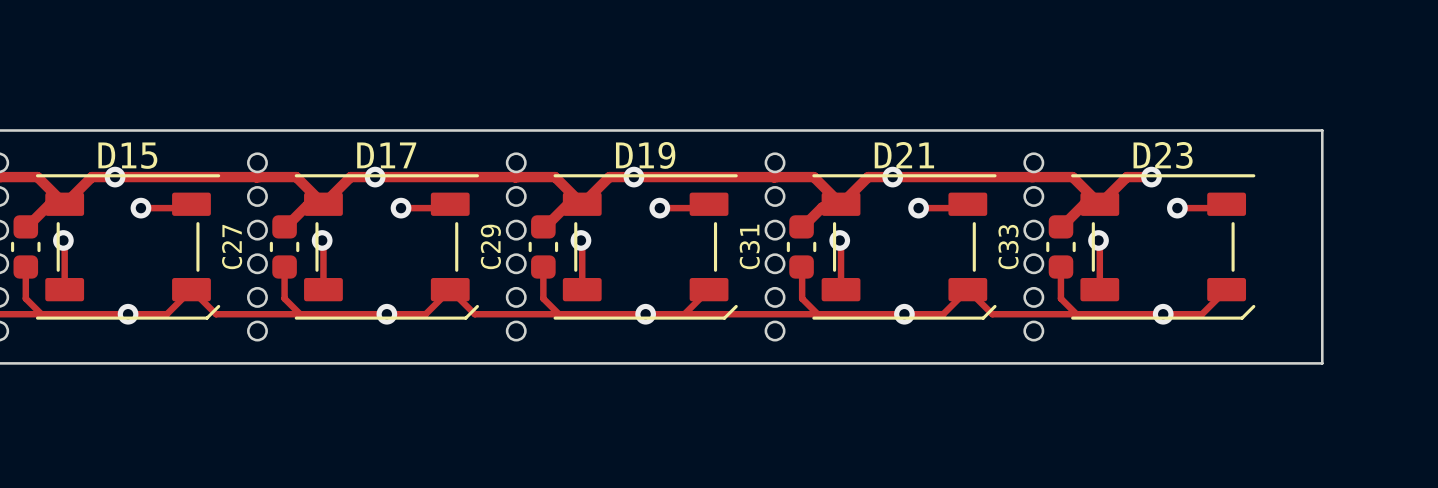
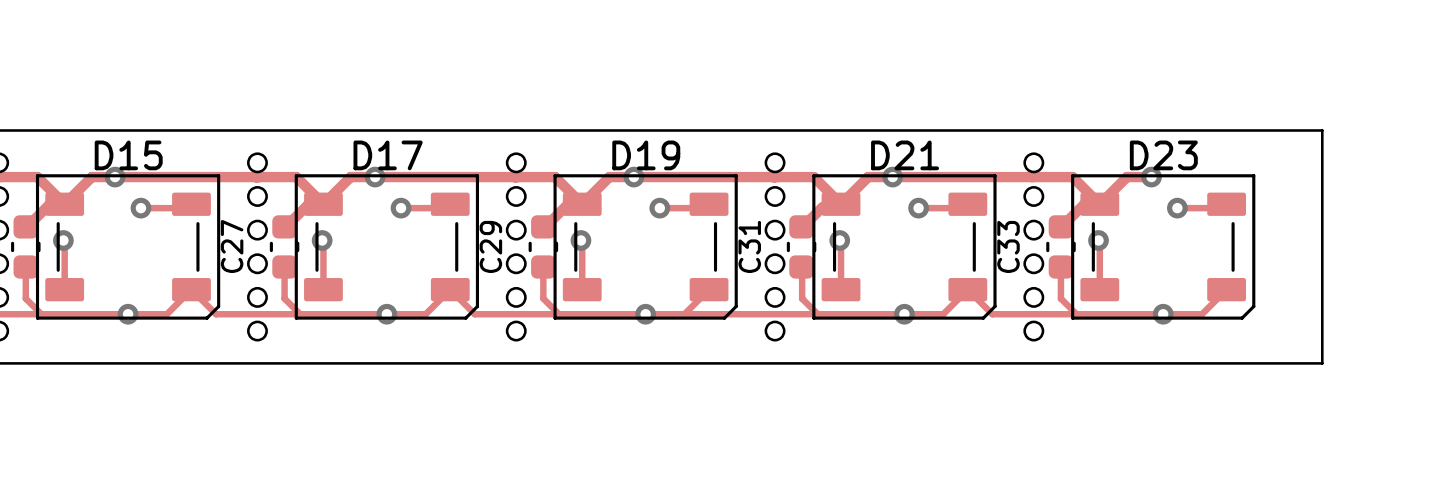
D15 footprint: [35, 174, 221, 320] -> [35, 174, 221, 320]
D17 footprint: [294, 174, 479, 320] -> [294, 174, 479, 320]
D19 footprint: [553, 174, 738, 320] -> [553, 174, 738, 320]
D21 footprint: [812, 174, 997, 320] -> [812, 174, 997, 320]
D23 footprint: [1071, 174, 1256, 320] -> [1071, 174, 1256, 320]

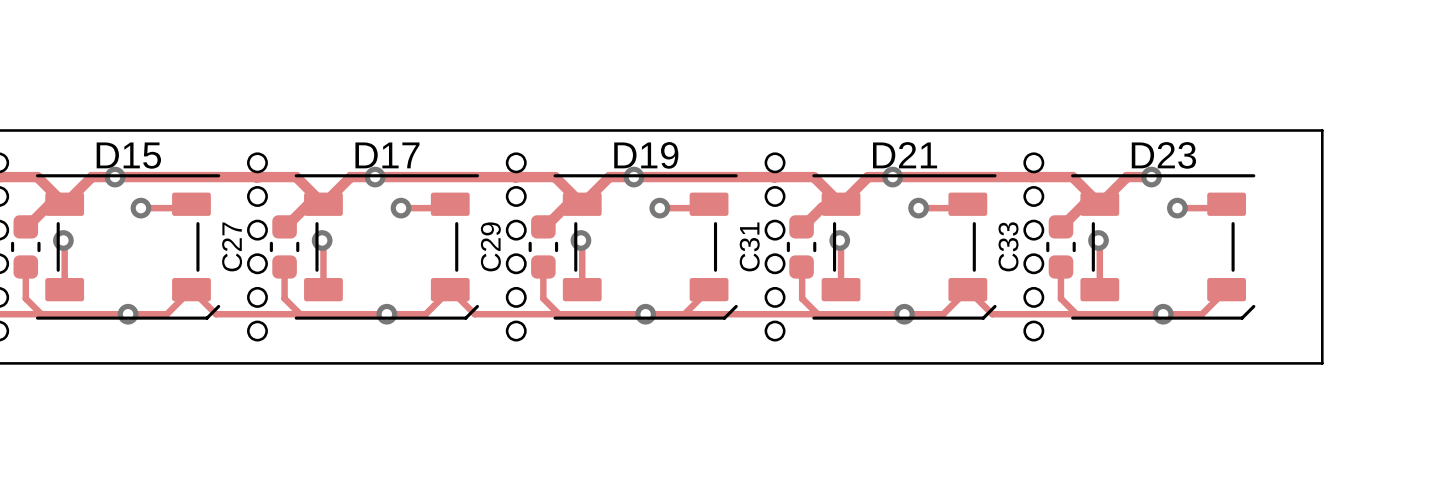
D15 footprint: [35, 174, 221, 320] -> [35, 174, 221, 320]
D17 footprint: [294, 174, 479, 320] -> [294, 174, 479, 320]
D19 footprint: [553, 174, 738, 320] -> [553, 174, 738, 320]
D21 footprint: [812, 174, 997, 320] -> [812, 174, 997, 320]
D23 footprint: [1071, 174, 1256, 320] -> [1071, 174, 1256, 320]

